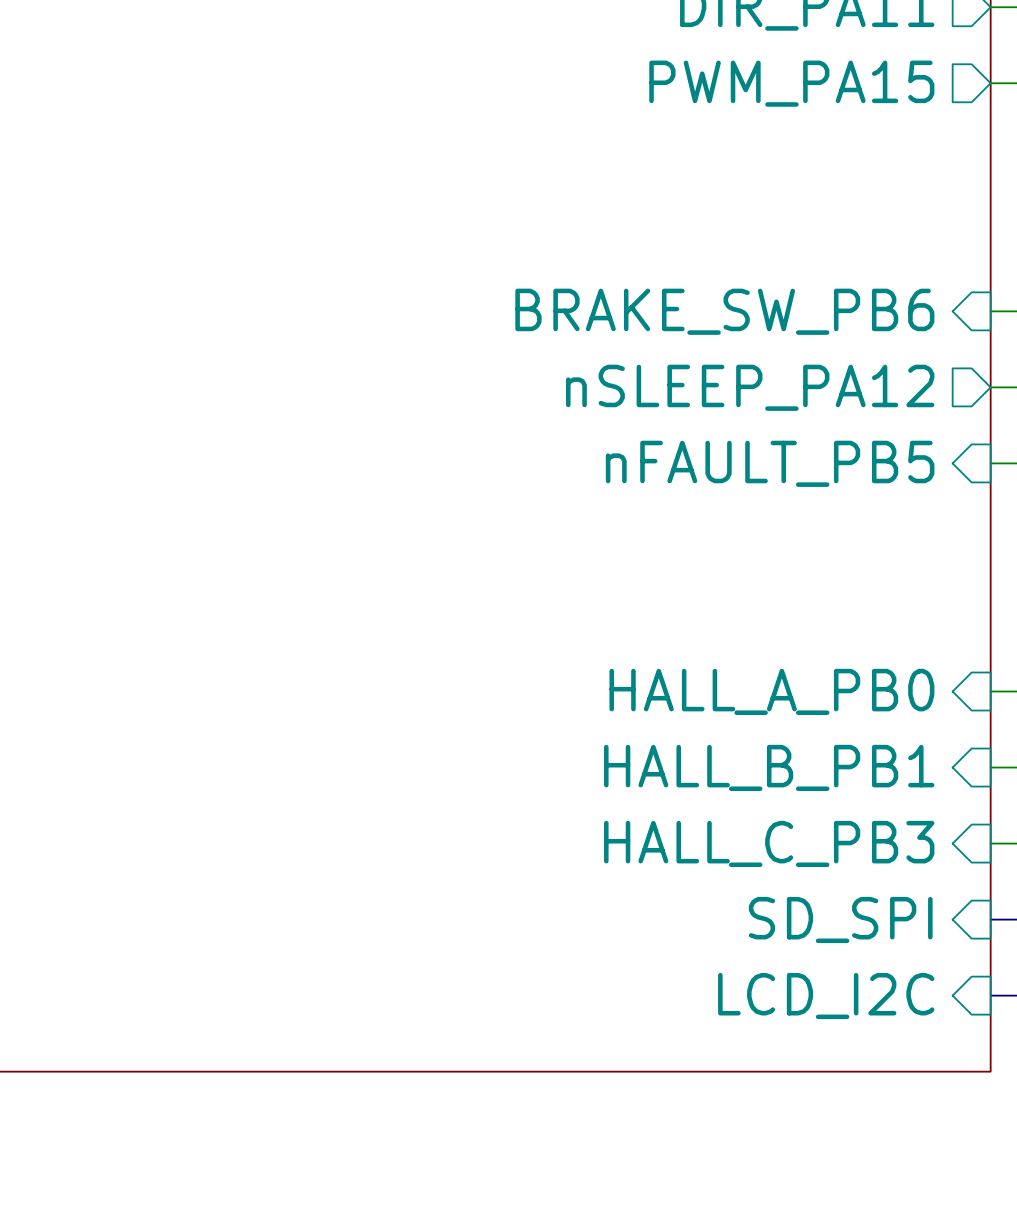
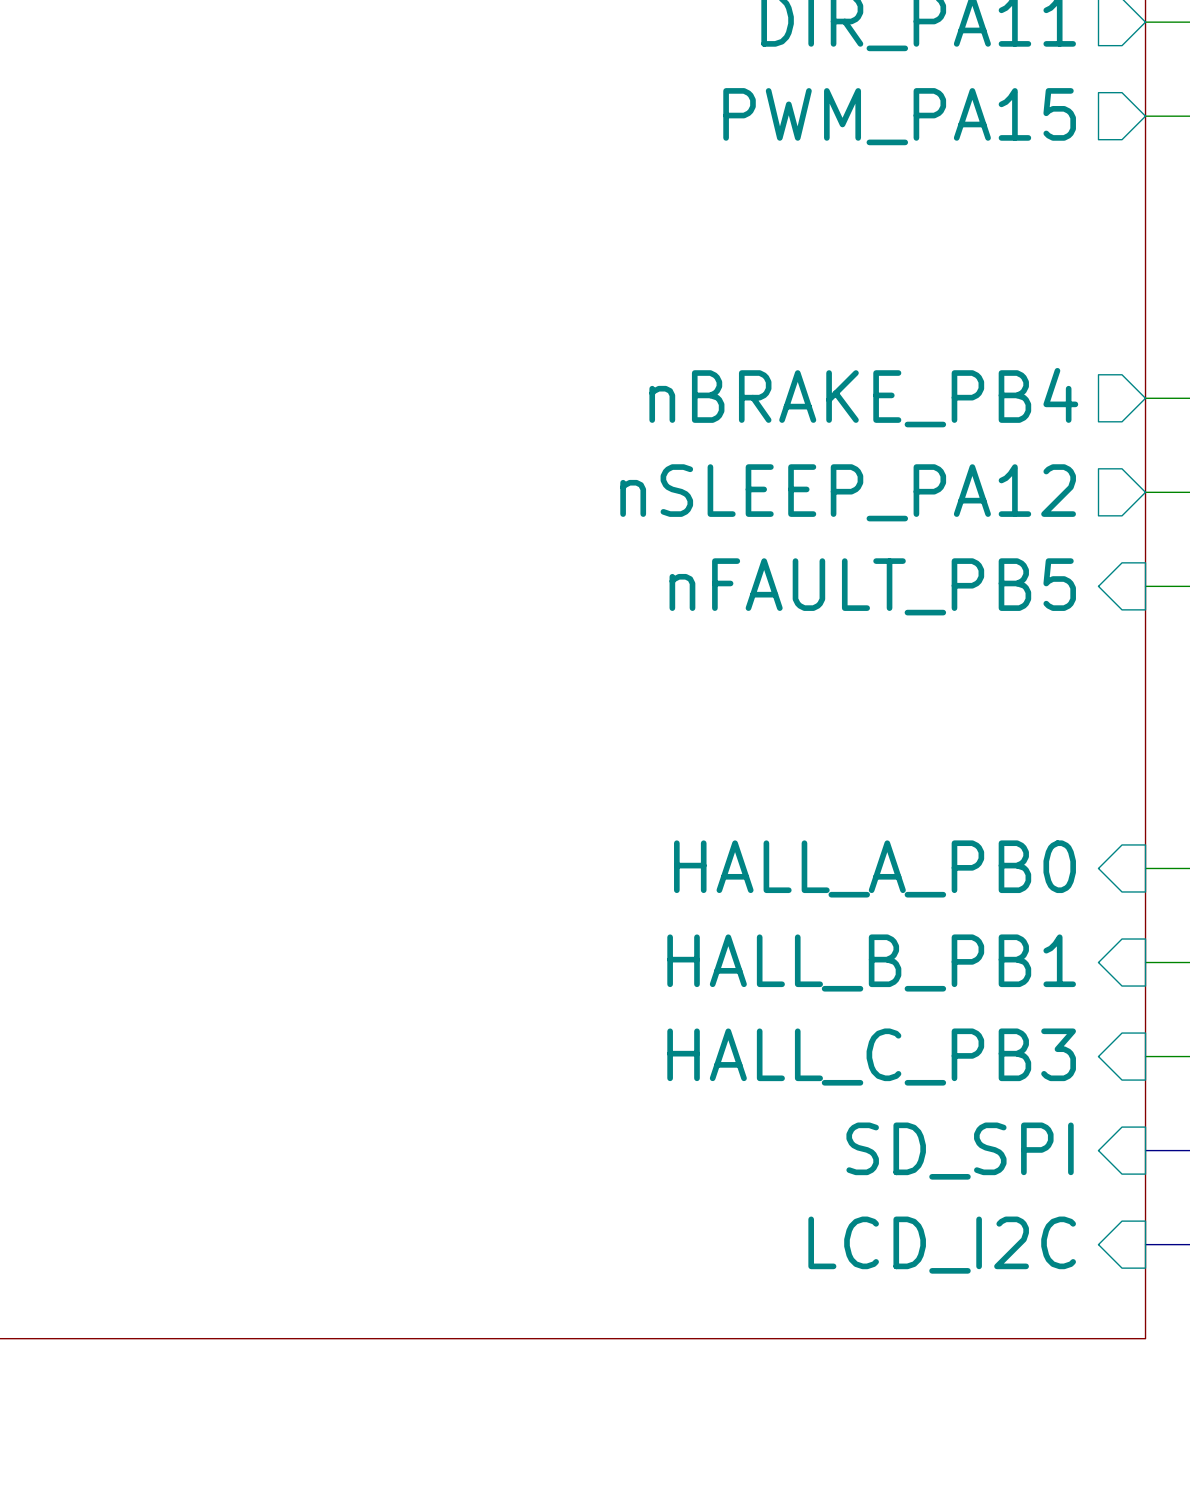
sheet pin shape: input (724, 311) -> output (863, 397)
sheet pin: BRAKE_SW_PB6 (724, 311) -> nBRAKE_PB4 (863, 397)

